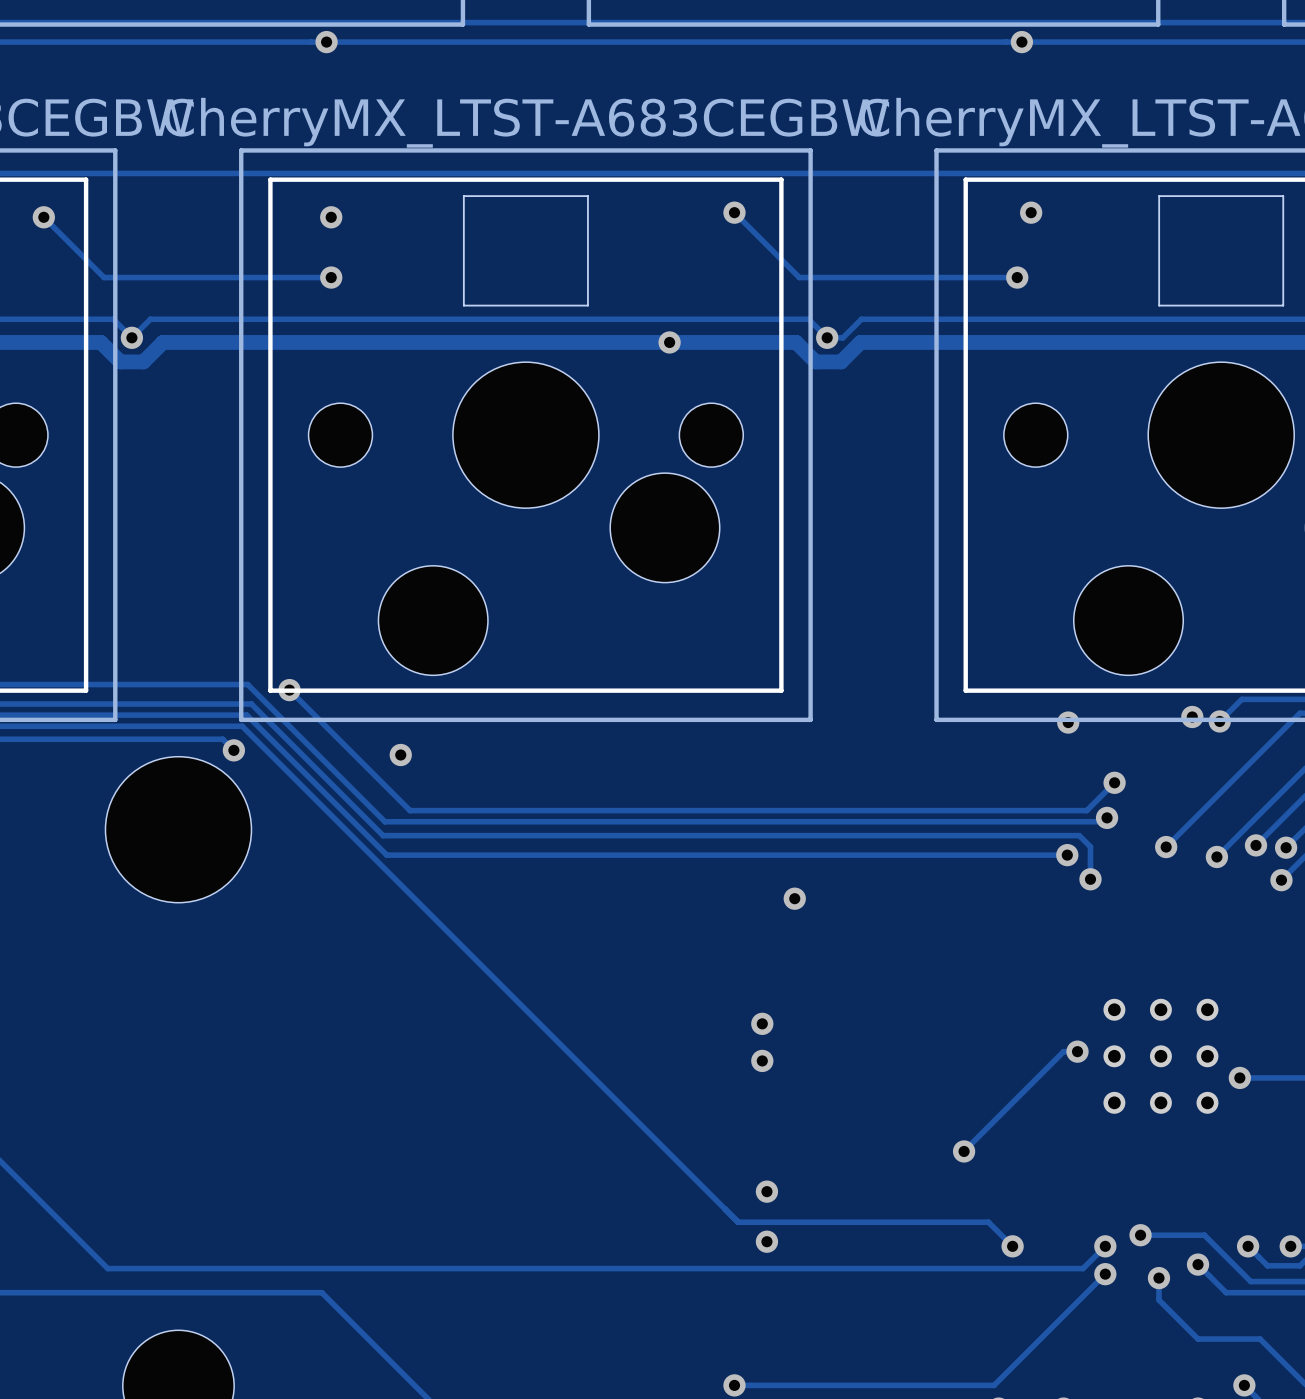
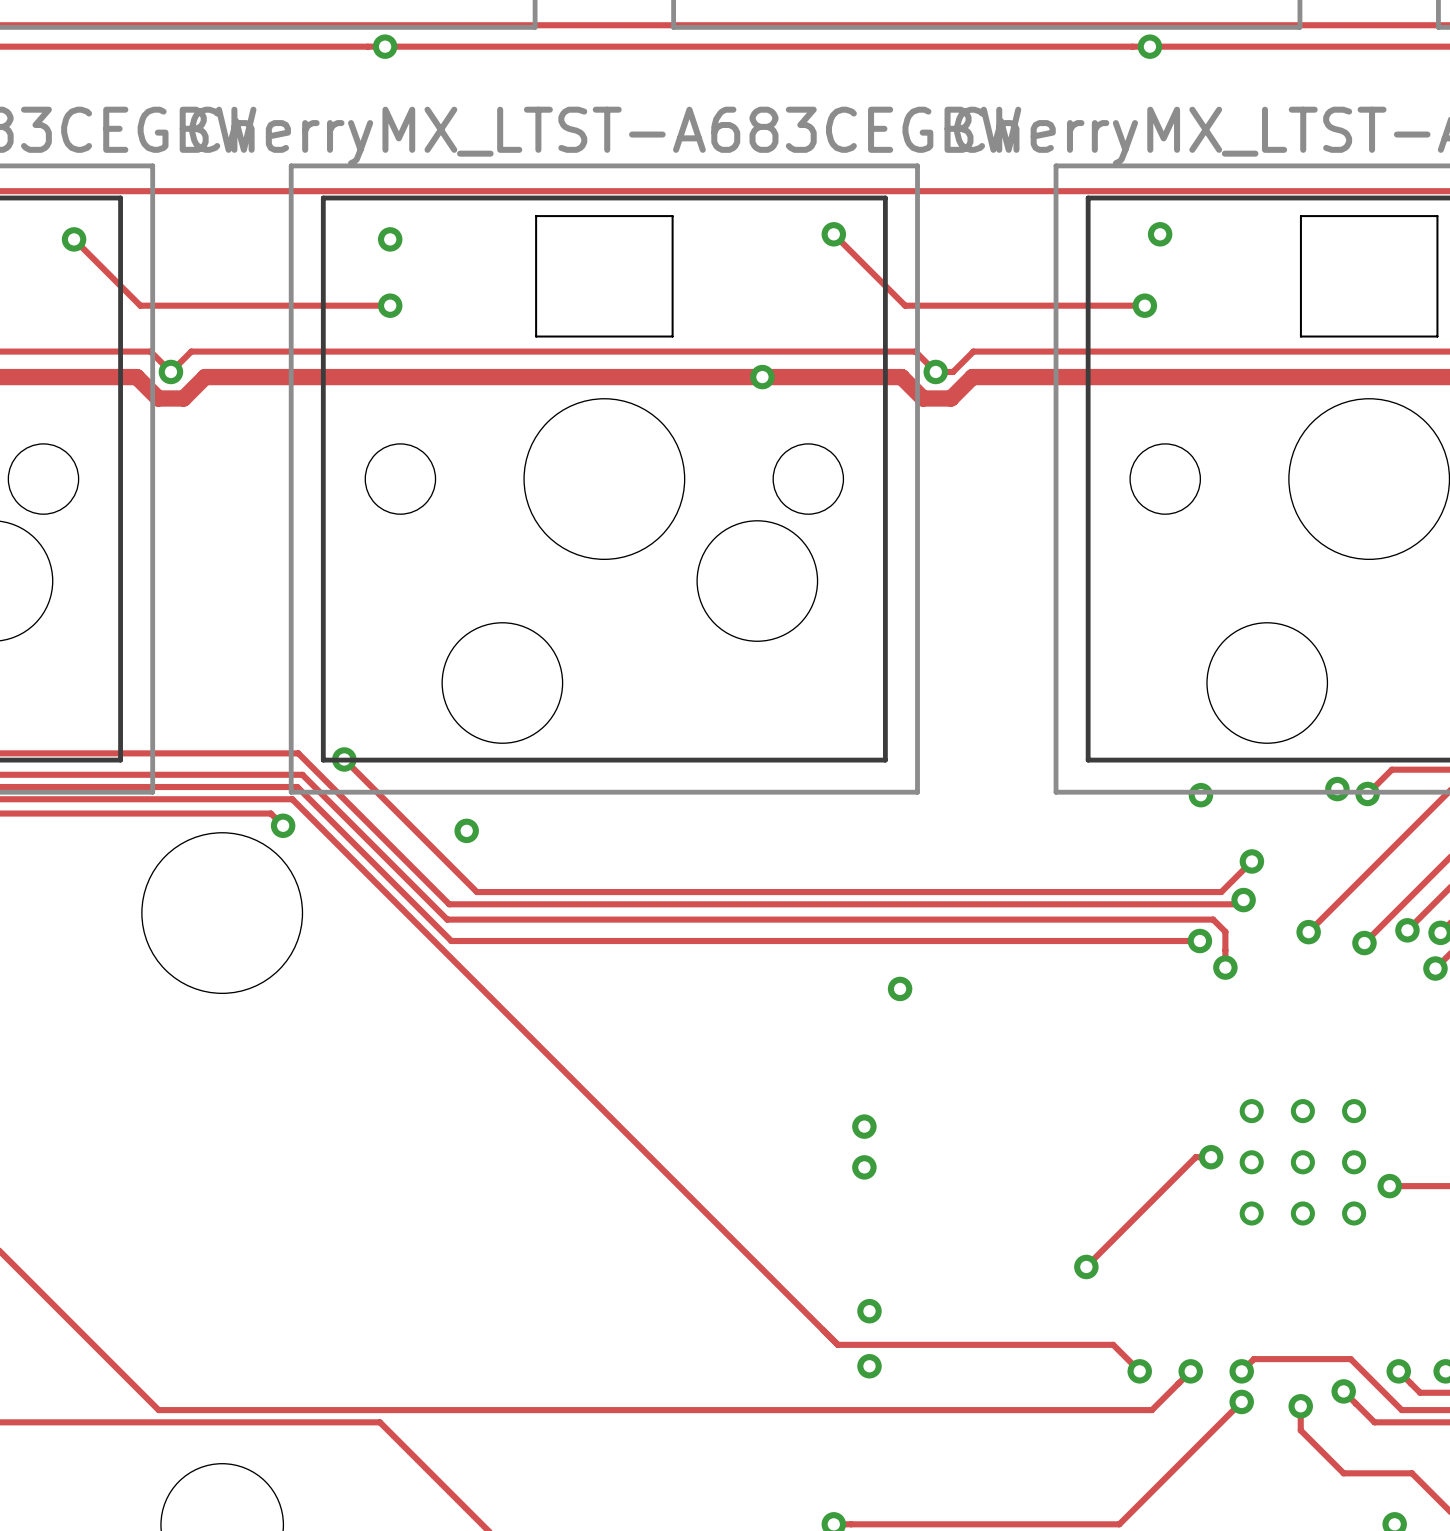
track: none -> (1280, 1359) (1253, 1359) (1241, 1371)
via position: (1140, 1235) -> (1190, 1371)
track: (1105, 1246) (1083, 1268) (107, 1268) -> (1190, 1371) (1151, 1410) (158, 1410) (144, 1395)

